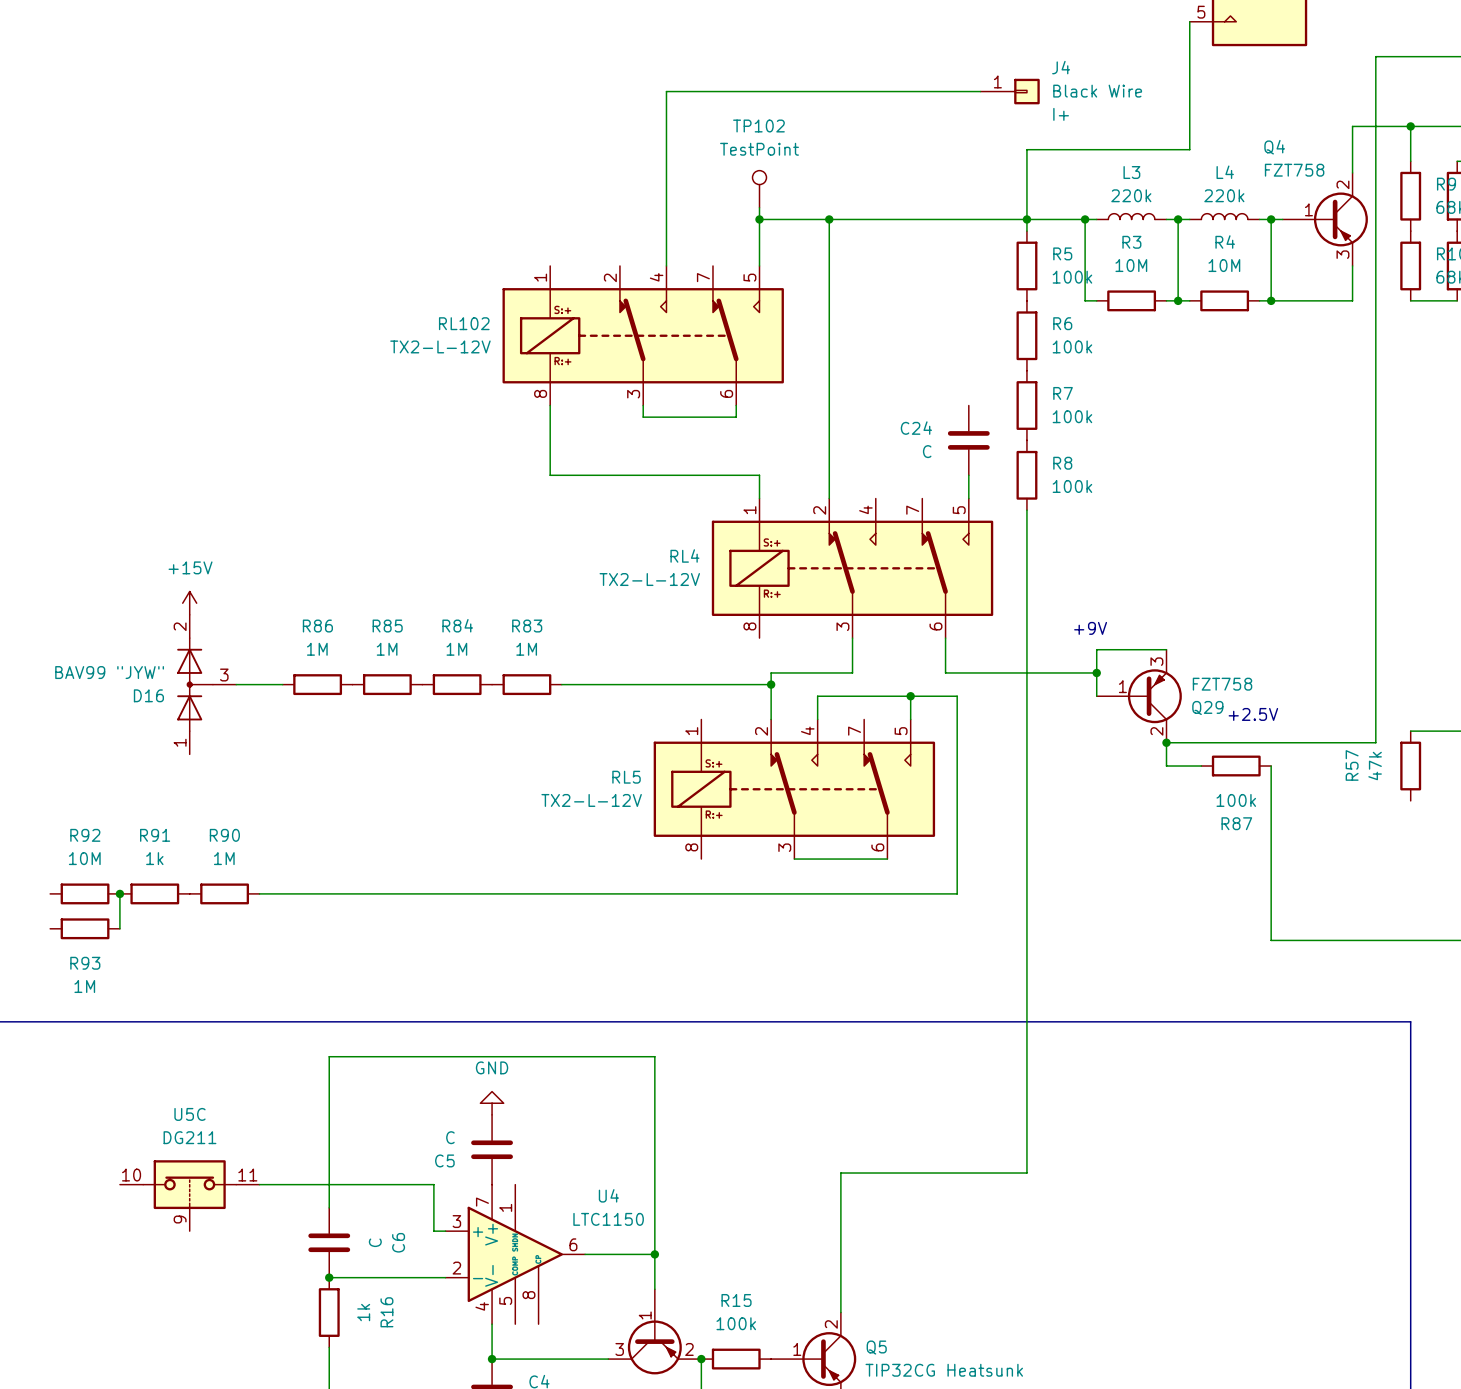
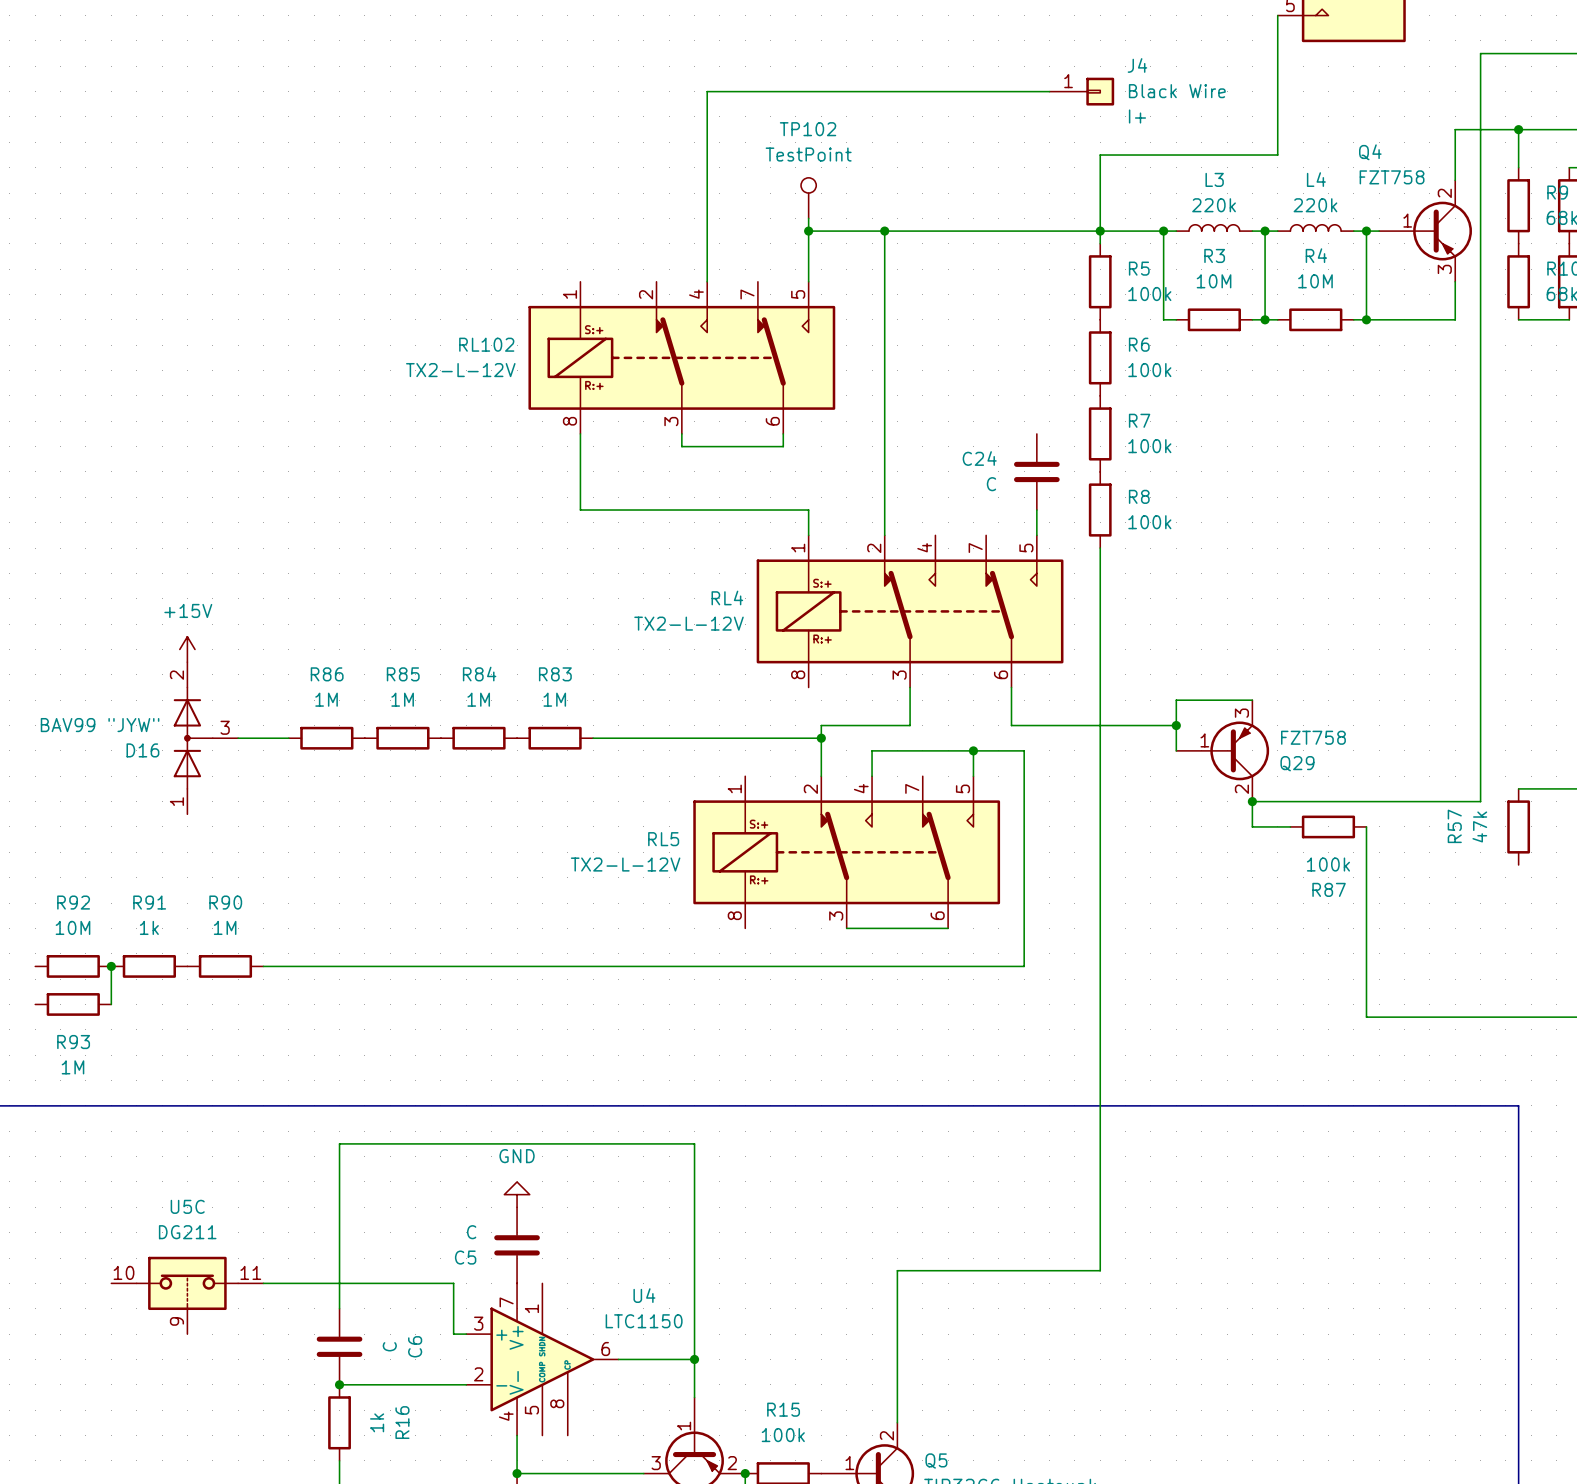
text: +9V (1090, 628) -> none
text: +2.5V (1253, 714) -> none

